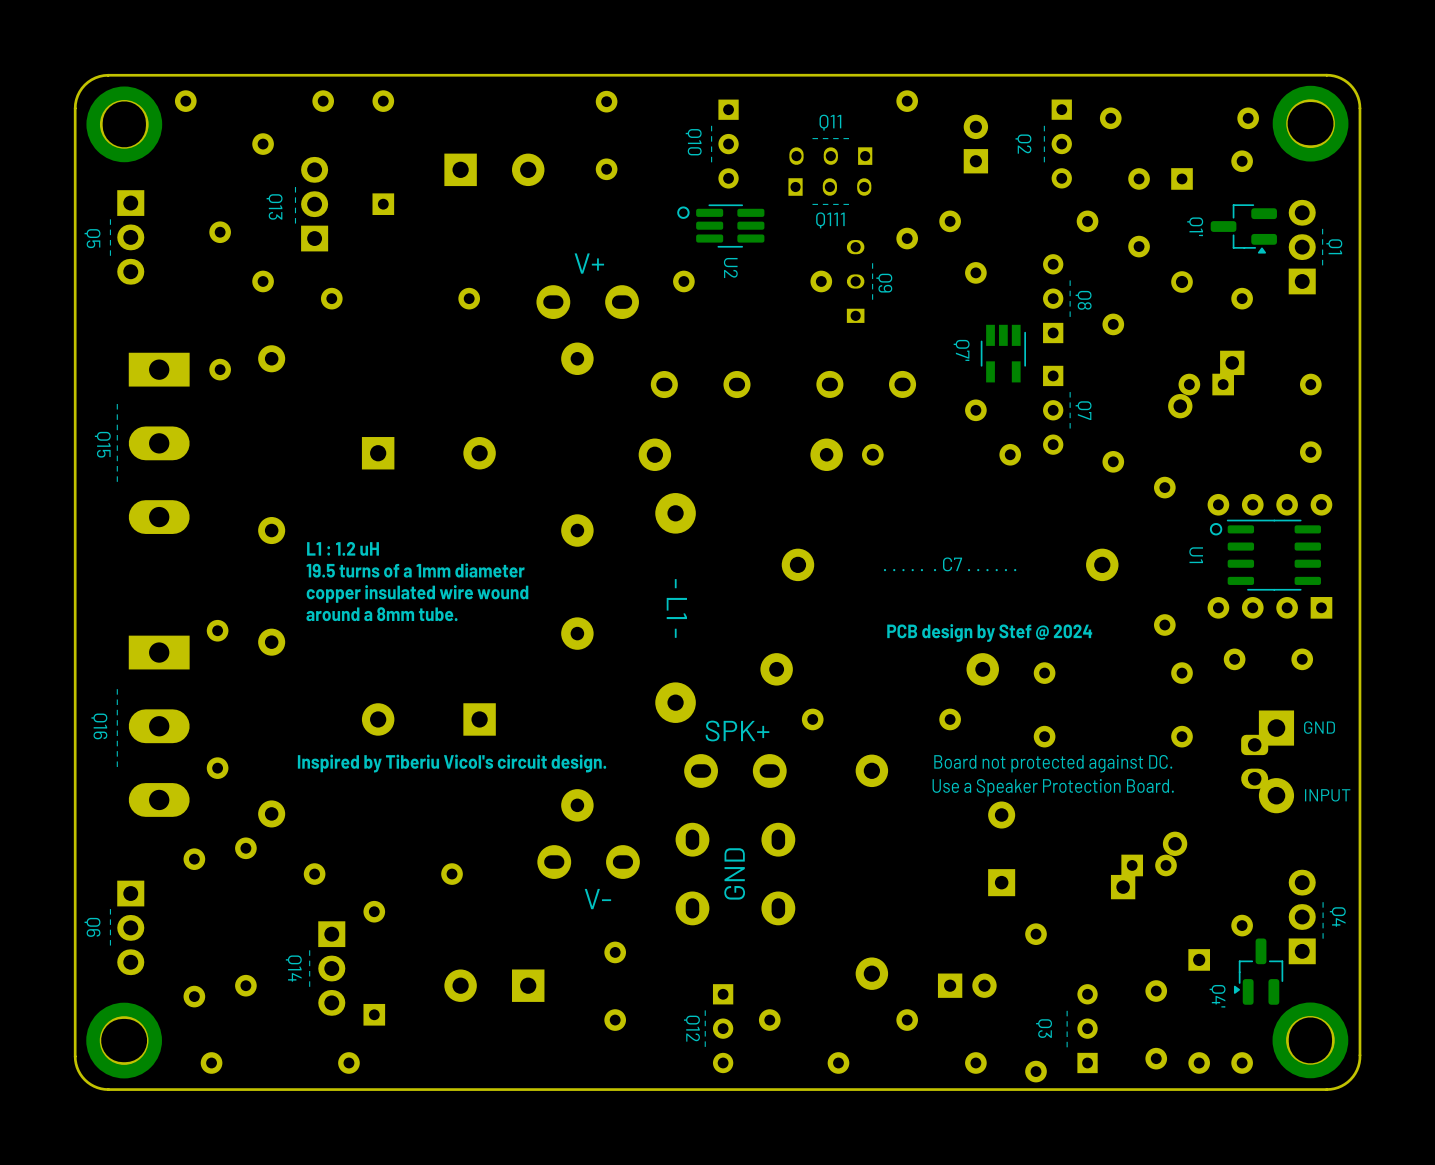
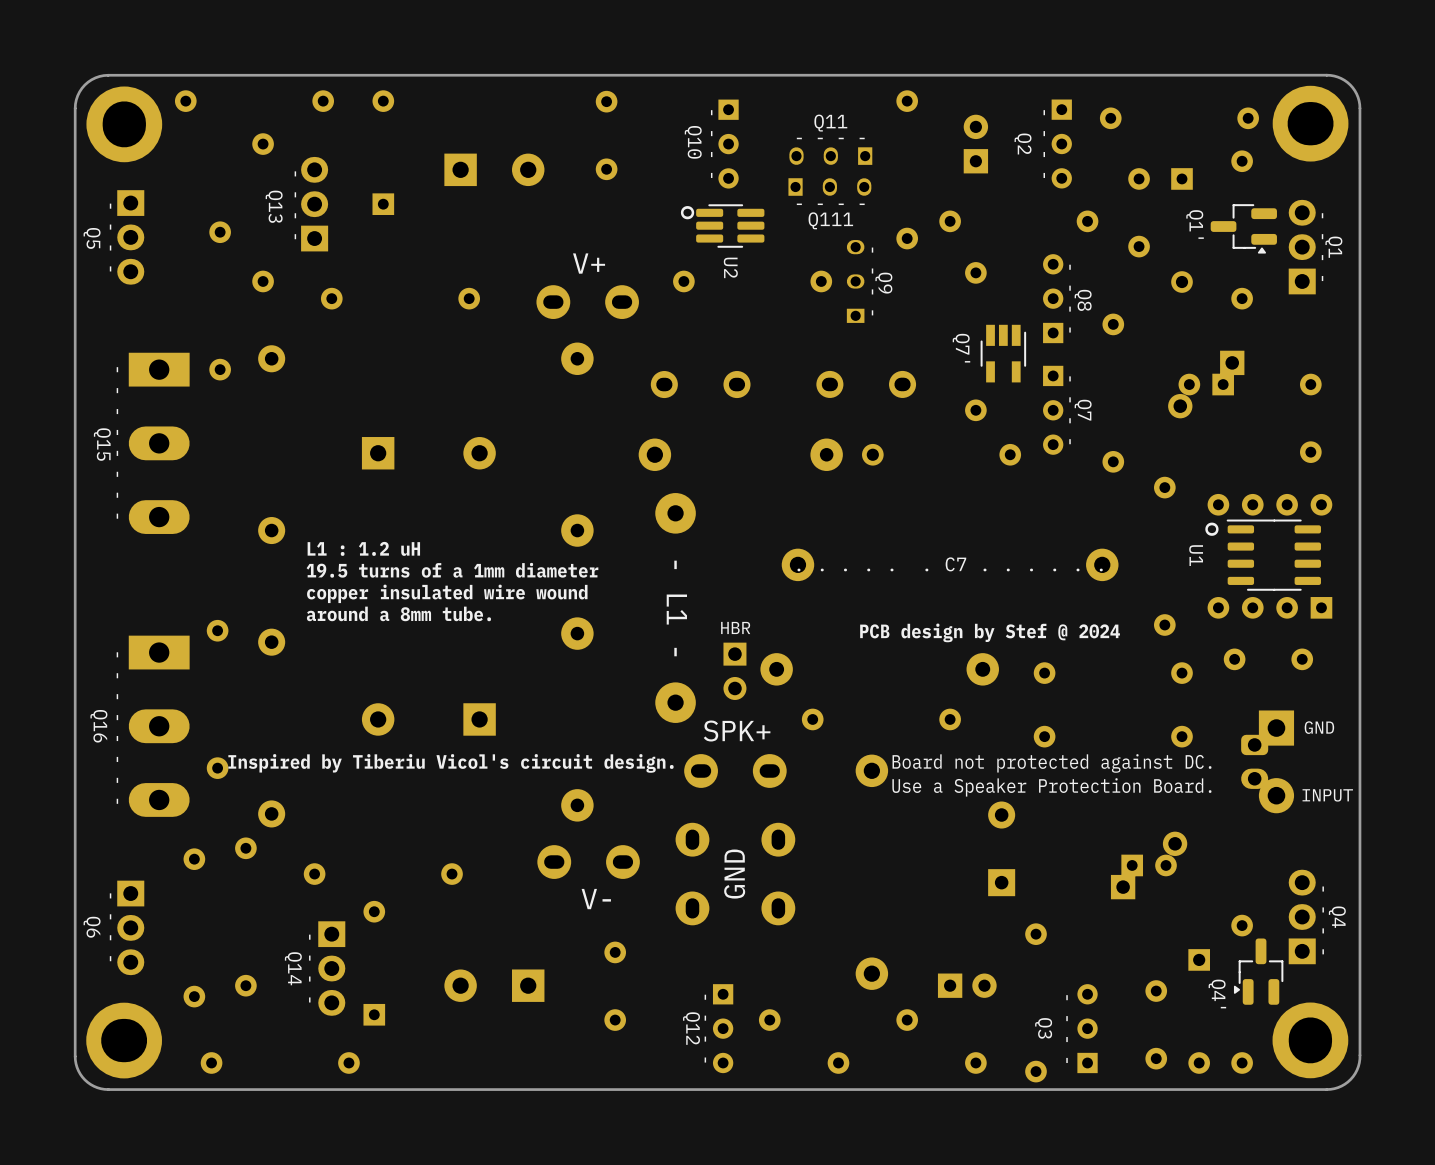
text: none -> HBR (735, 627)
part: none -> (734, 671)

